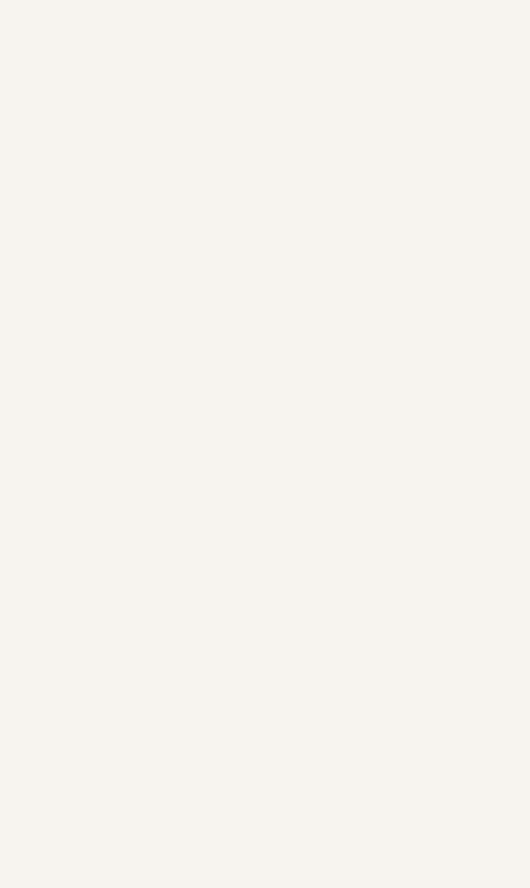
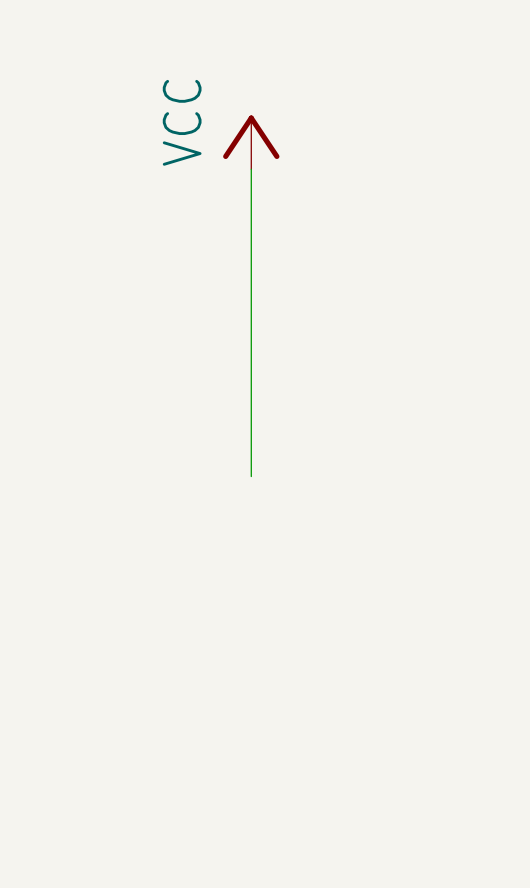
power symbol: none -> VCC (251, 142)
wire: none -> (251, 169) (251, 476)

